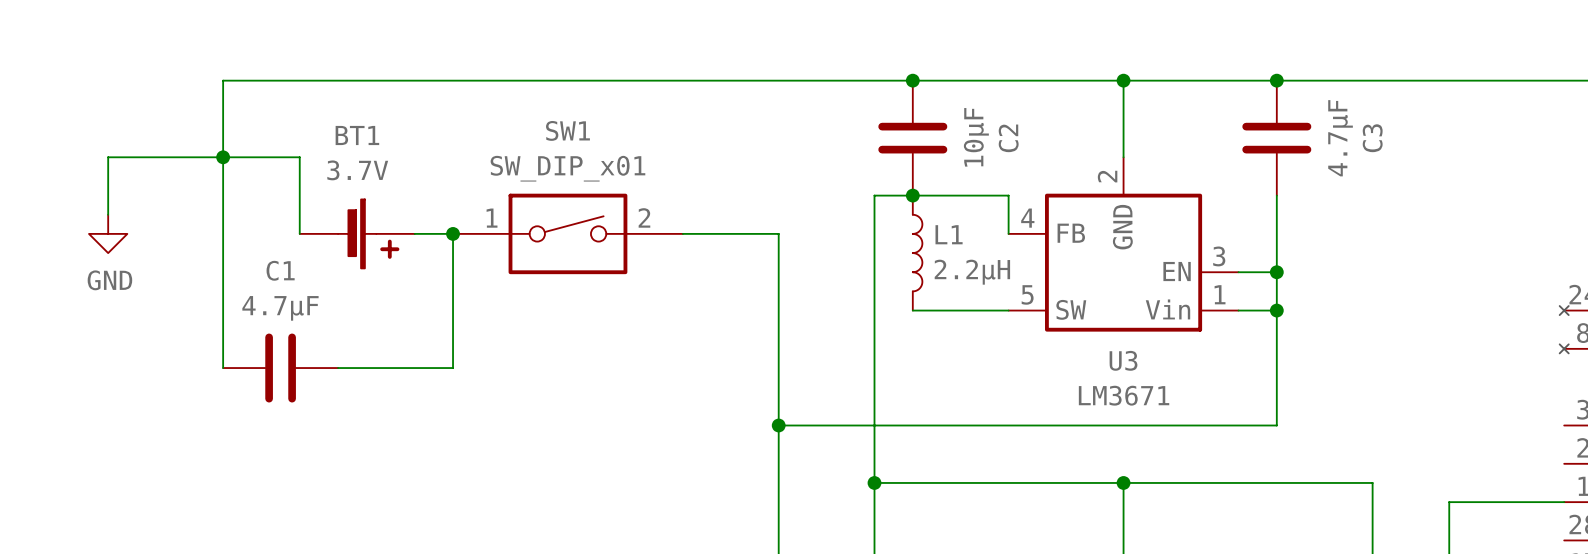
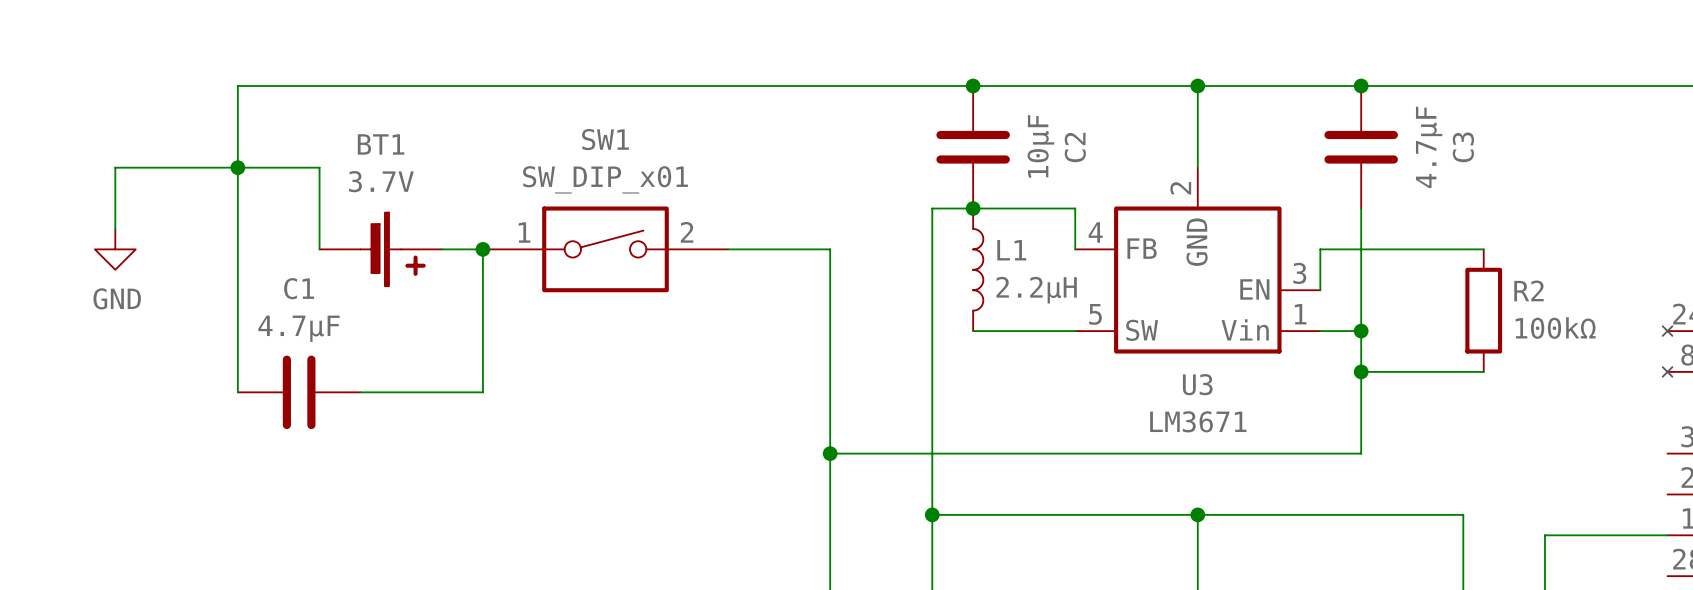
wire: (1238, 272) (1276, 272) -> (1320, 290) (1320, 249) (1483, 249)
junction position: (1276, 272) -> (1361, 371)
R2: none -> 100kΩ (1483, 310)
wire: none -> (1361, 371) (1483, 371)

